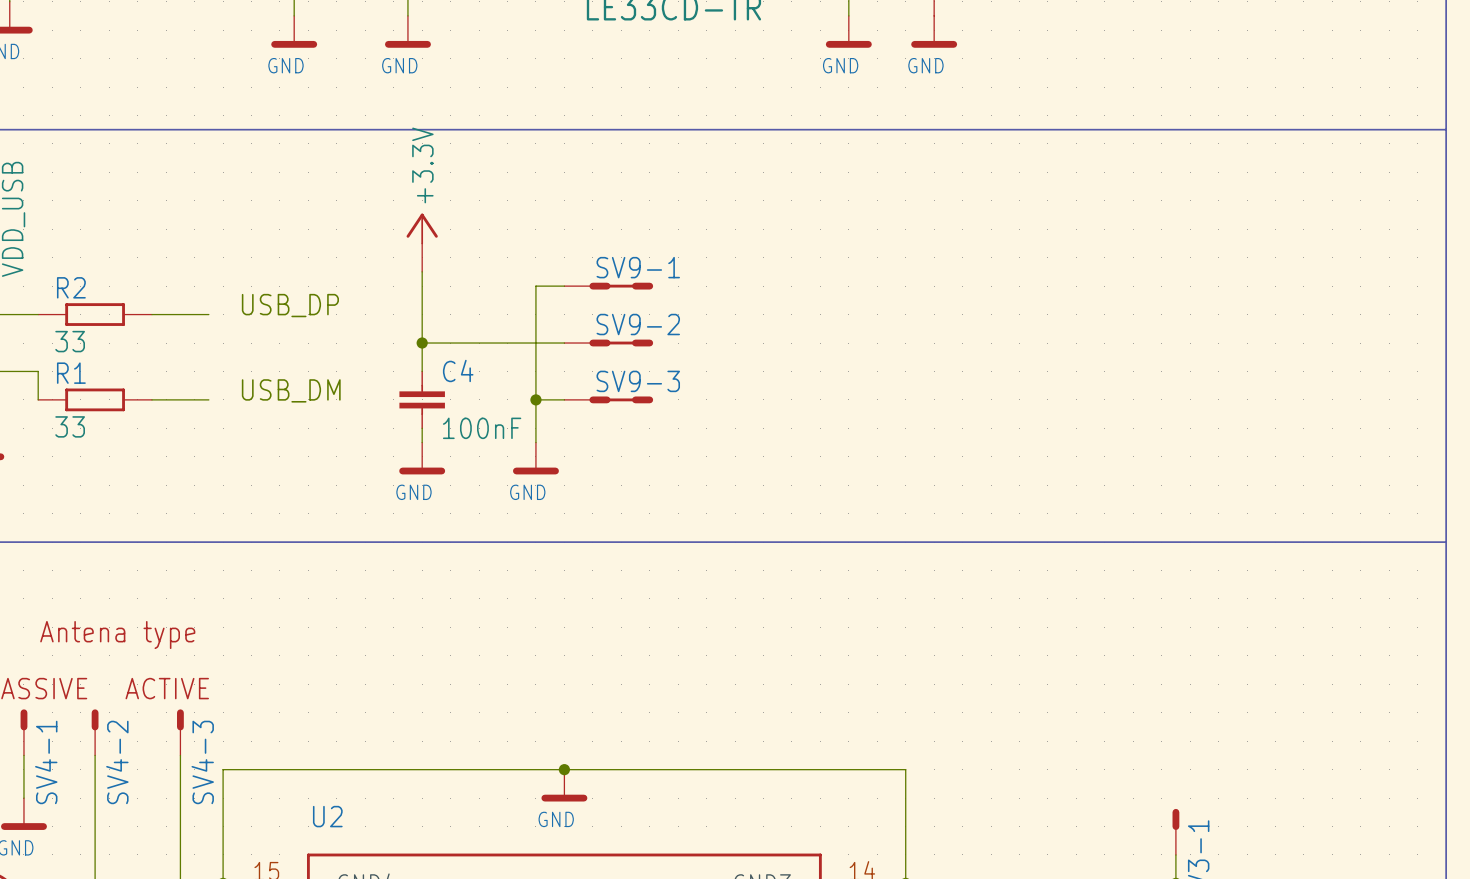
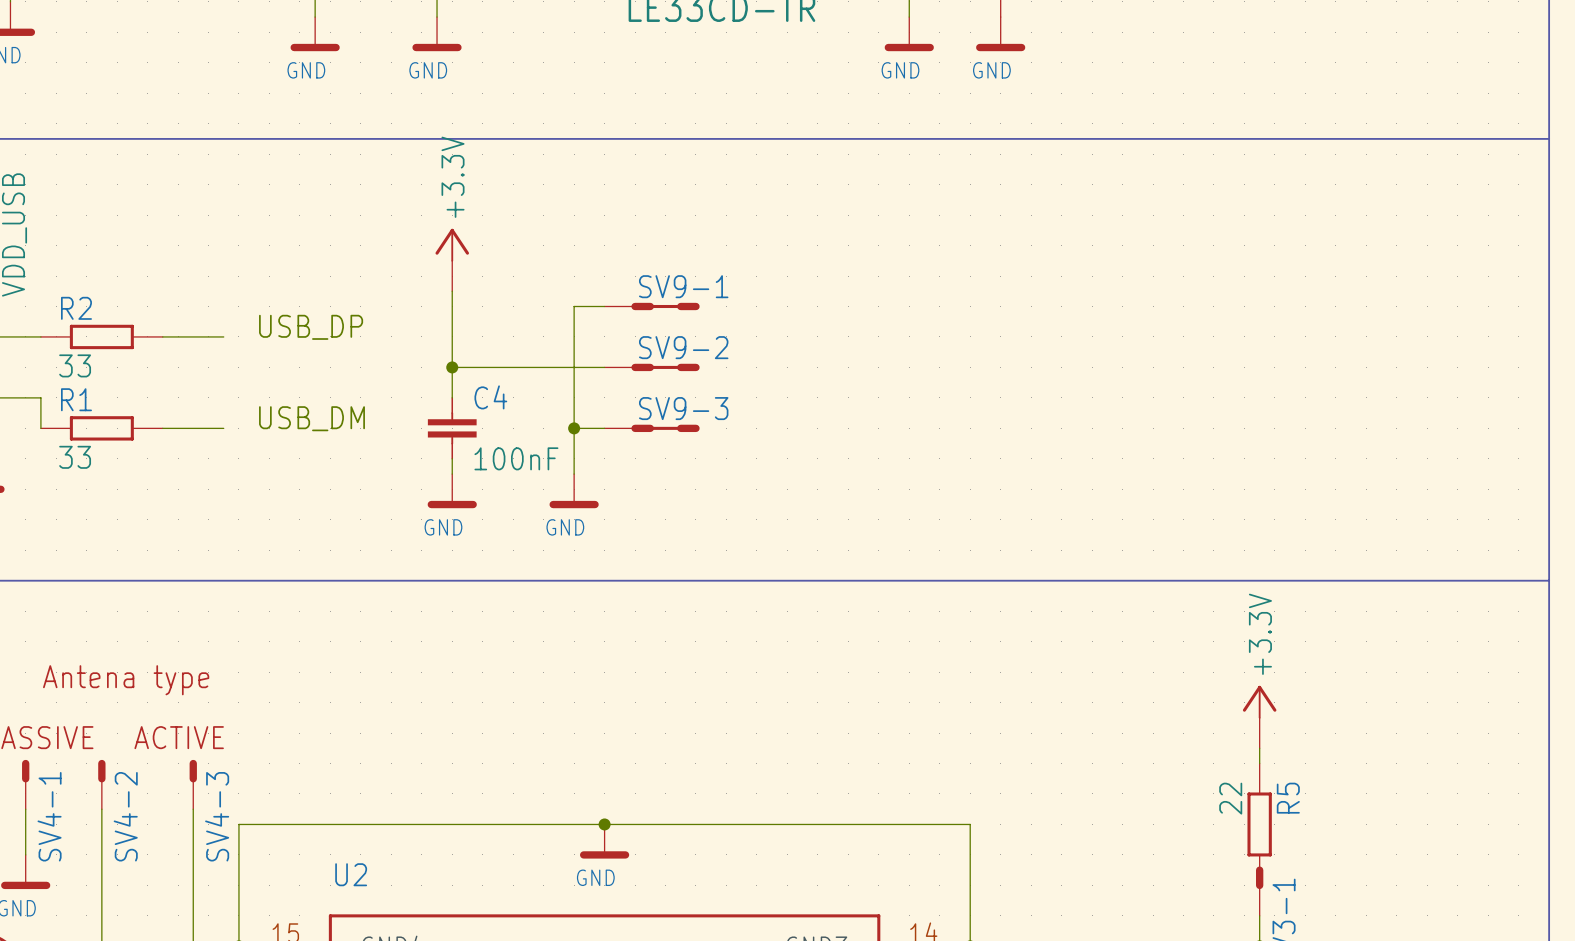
power symbol: none -> +3.3V (1259, 717)
wire: none -> (1259, 748) (1259, 763)
R5: none -> 22 (1259, 824)

